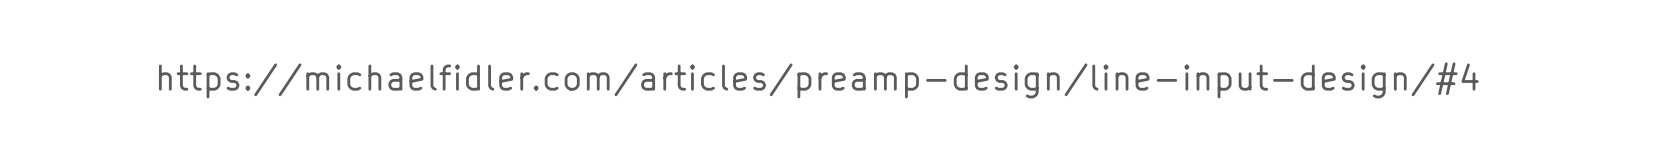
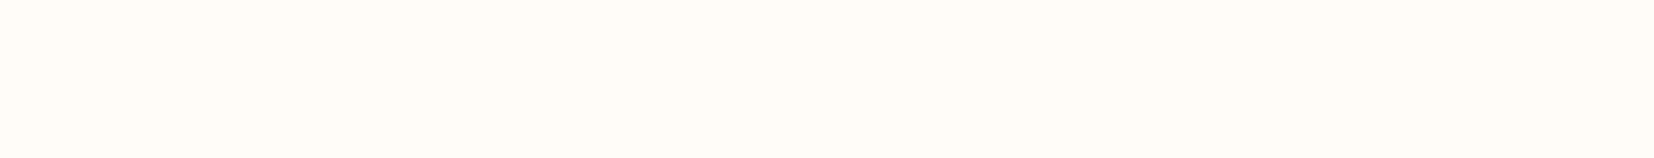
text: https://michaelfidler.com/articles/preamp-design/line-input-design/#4 (818, 80) -> none

